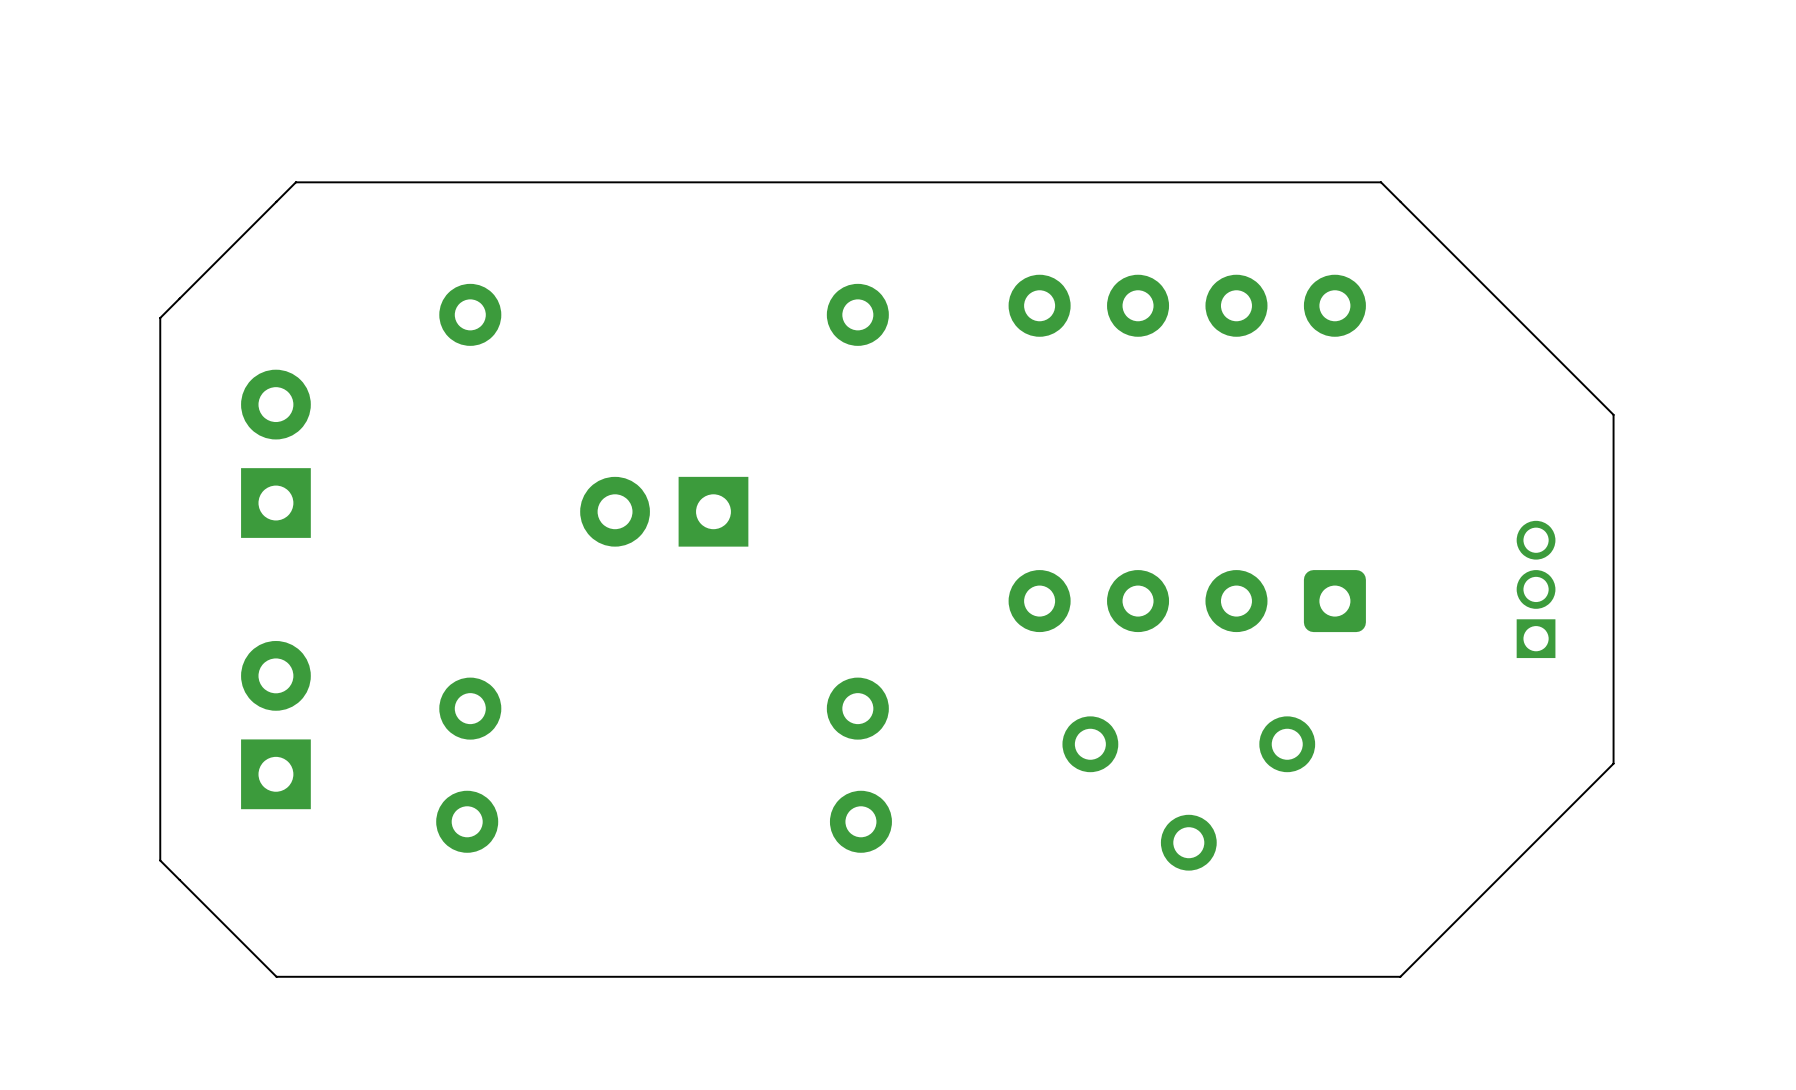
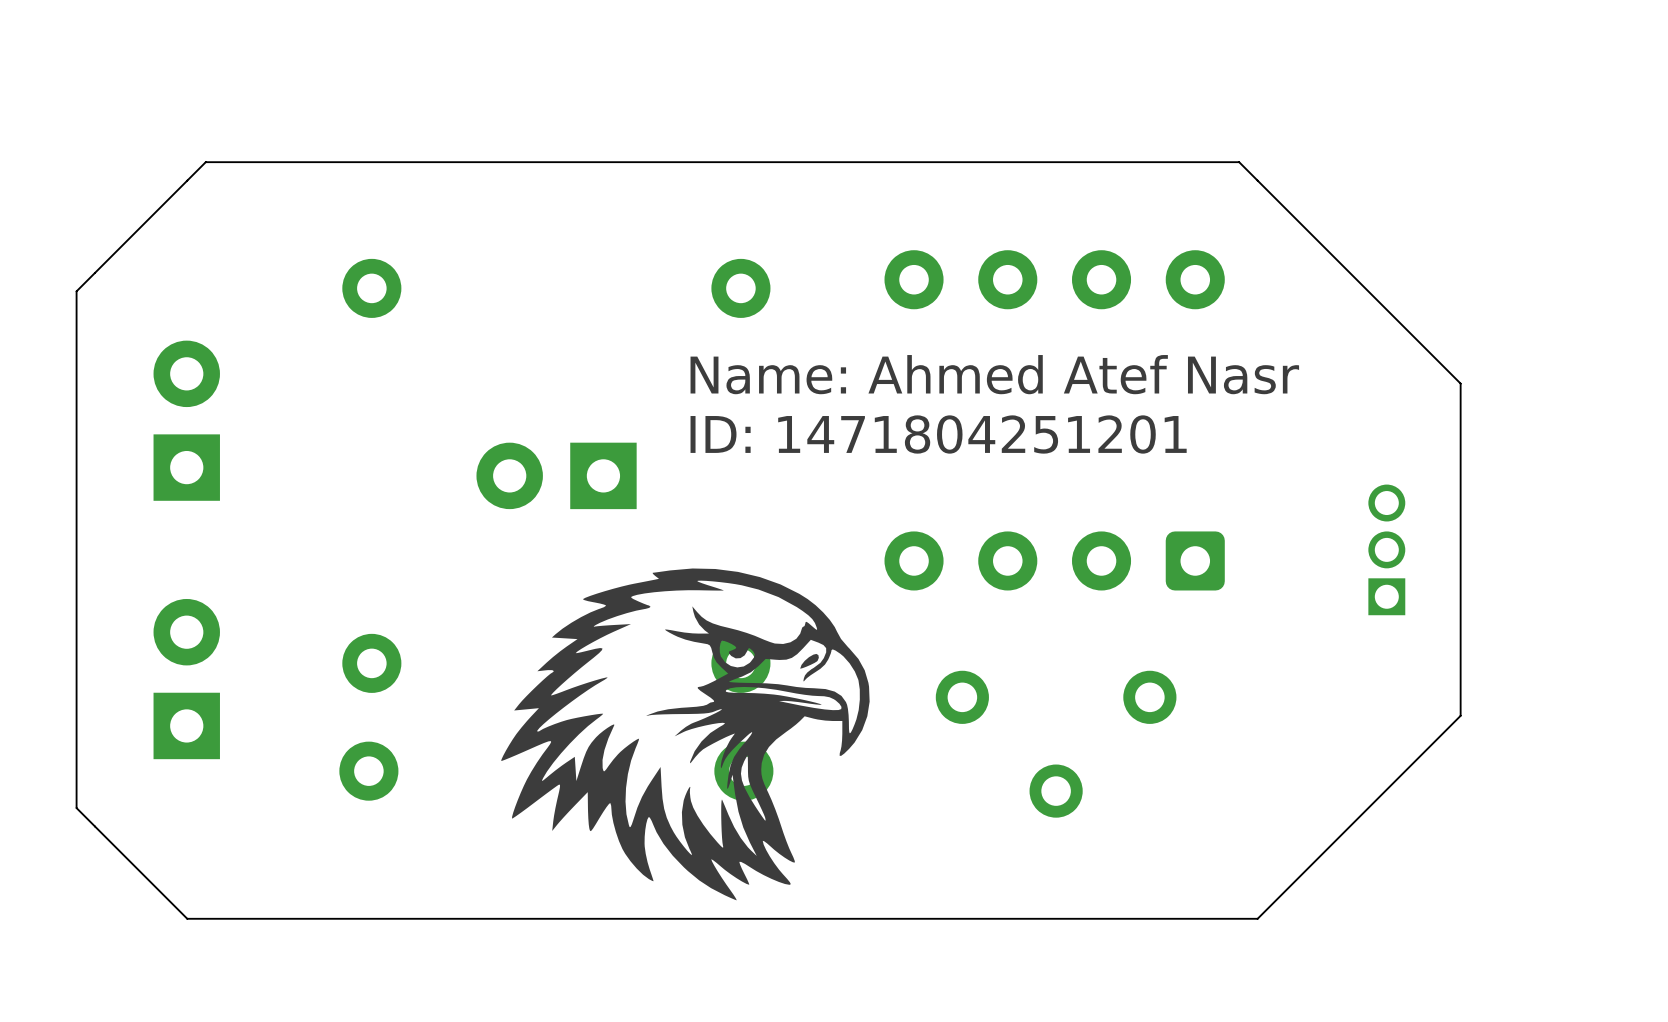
text: none -> Name: Ahmed Atef Nasr (994, 374)
text: none -> ID: 1471804251201 (938, 434)
drawing: none -> [501, 568, 870, 901]

